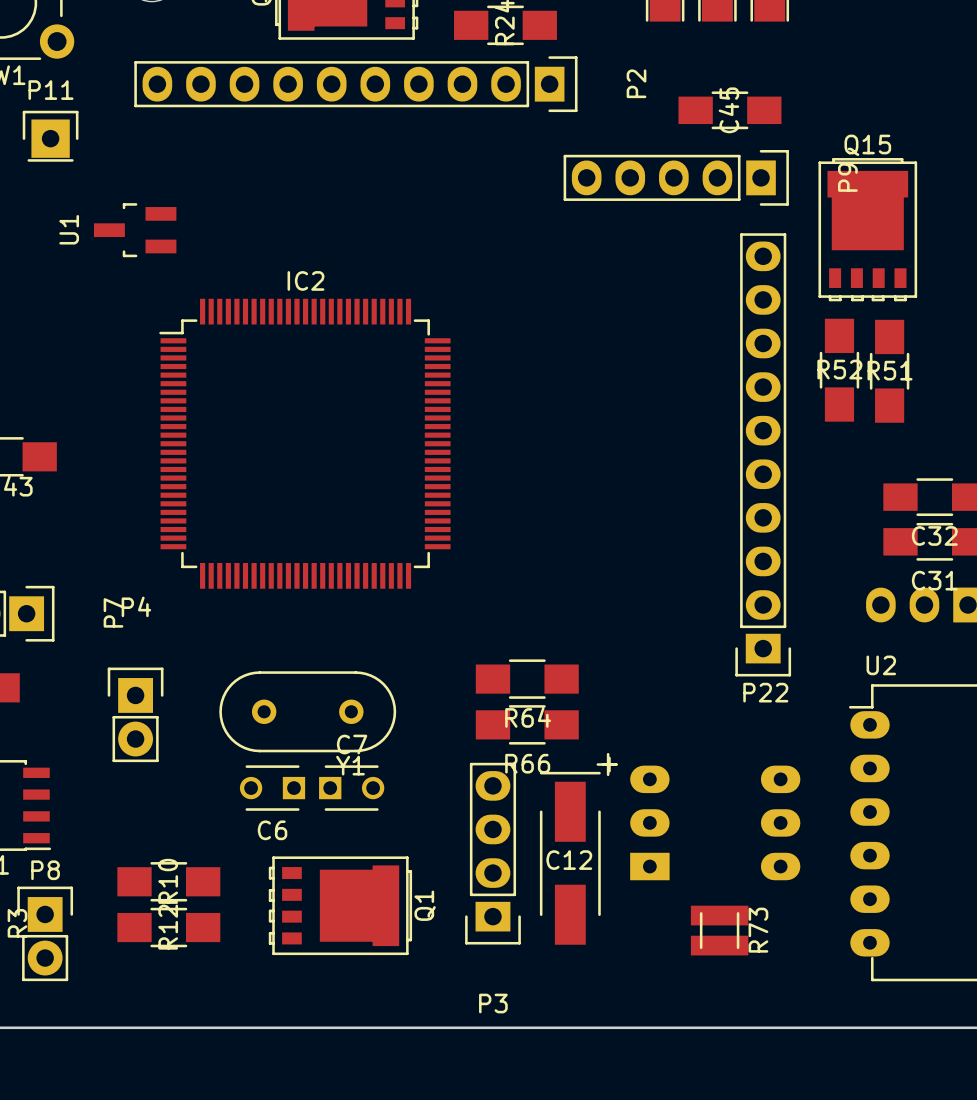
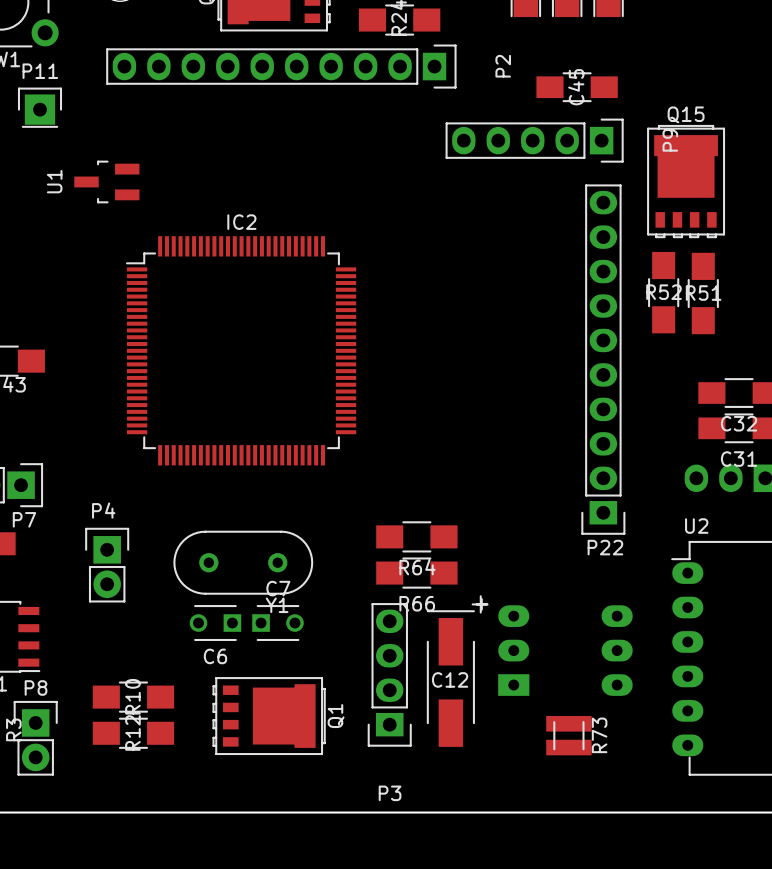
P4 name position: P4 (136, 606) -> P4 (103, 510)
P7 name rotation: 0° (113, 612) -> 90° clockwise (24, 519)
P7 name position: P7 (113, 612) -> P7 (24, 519)

